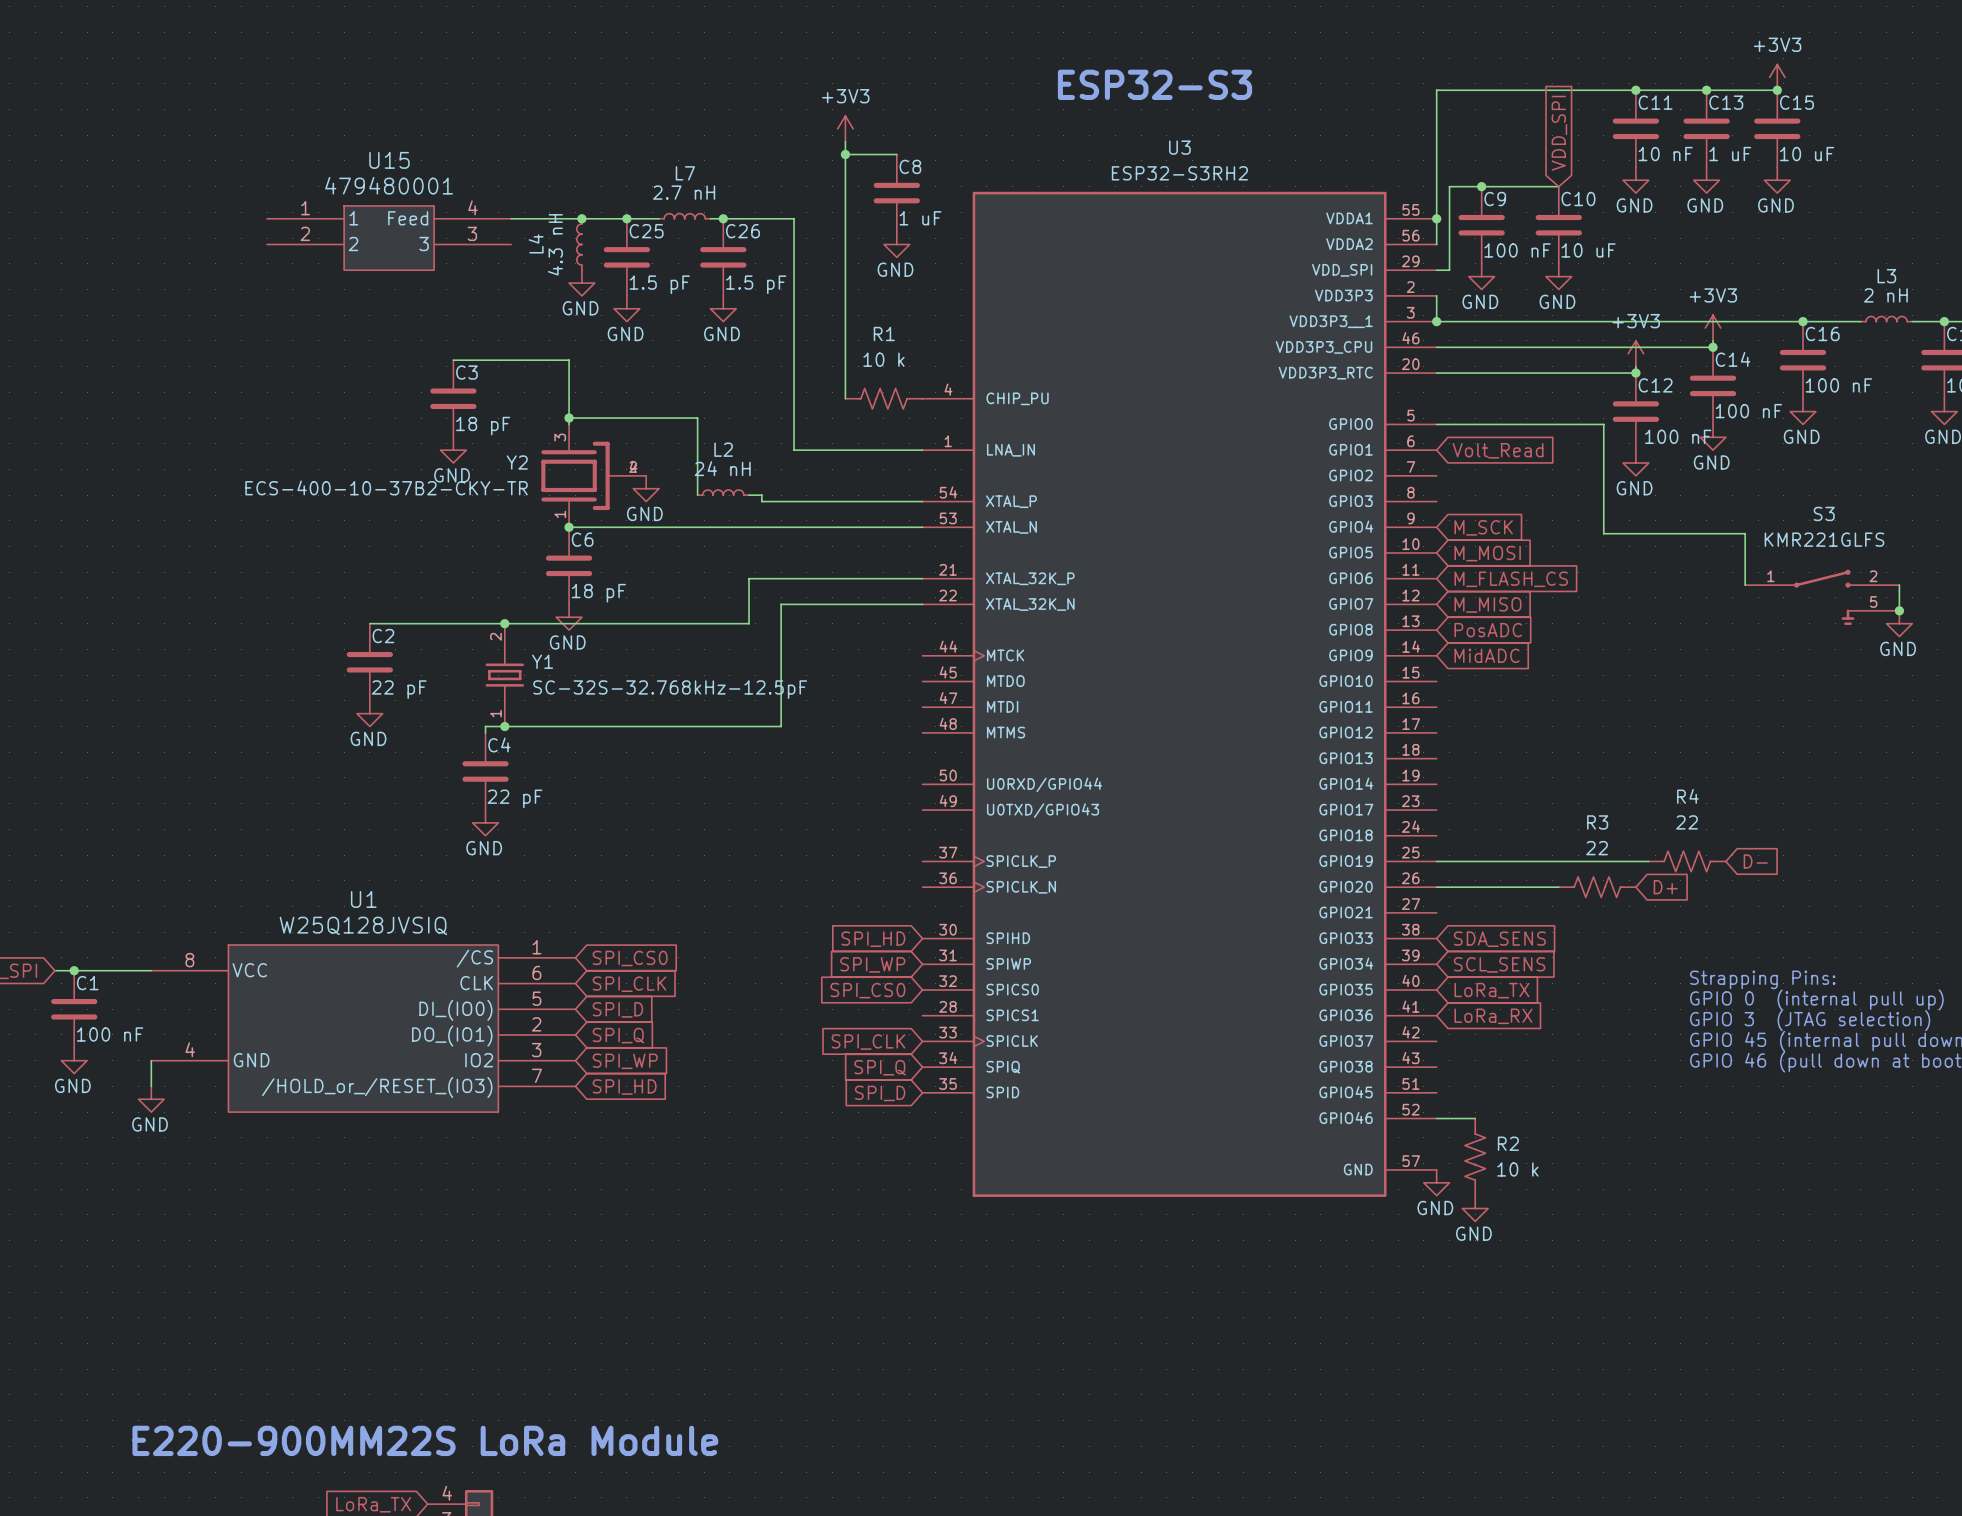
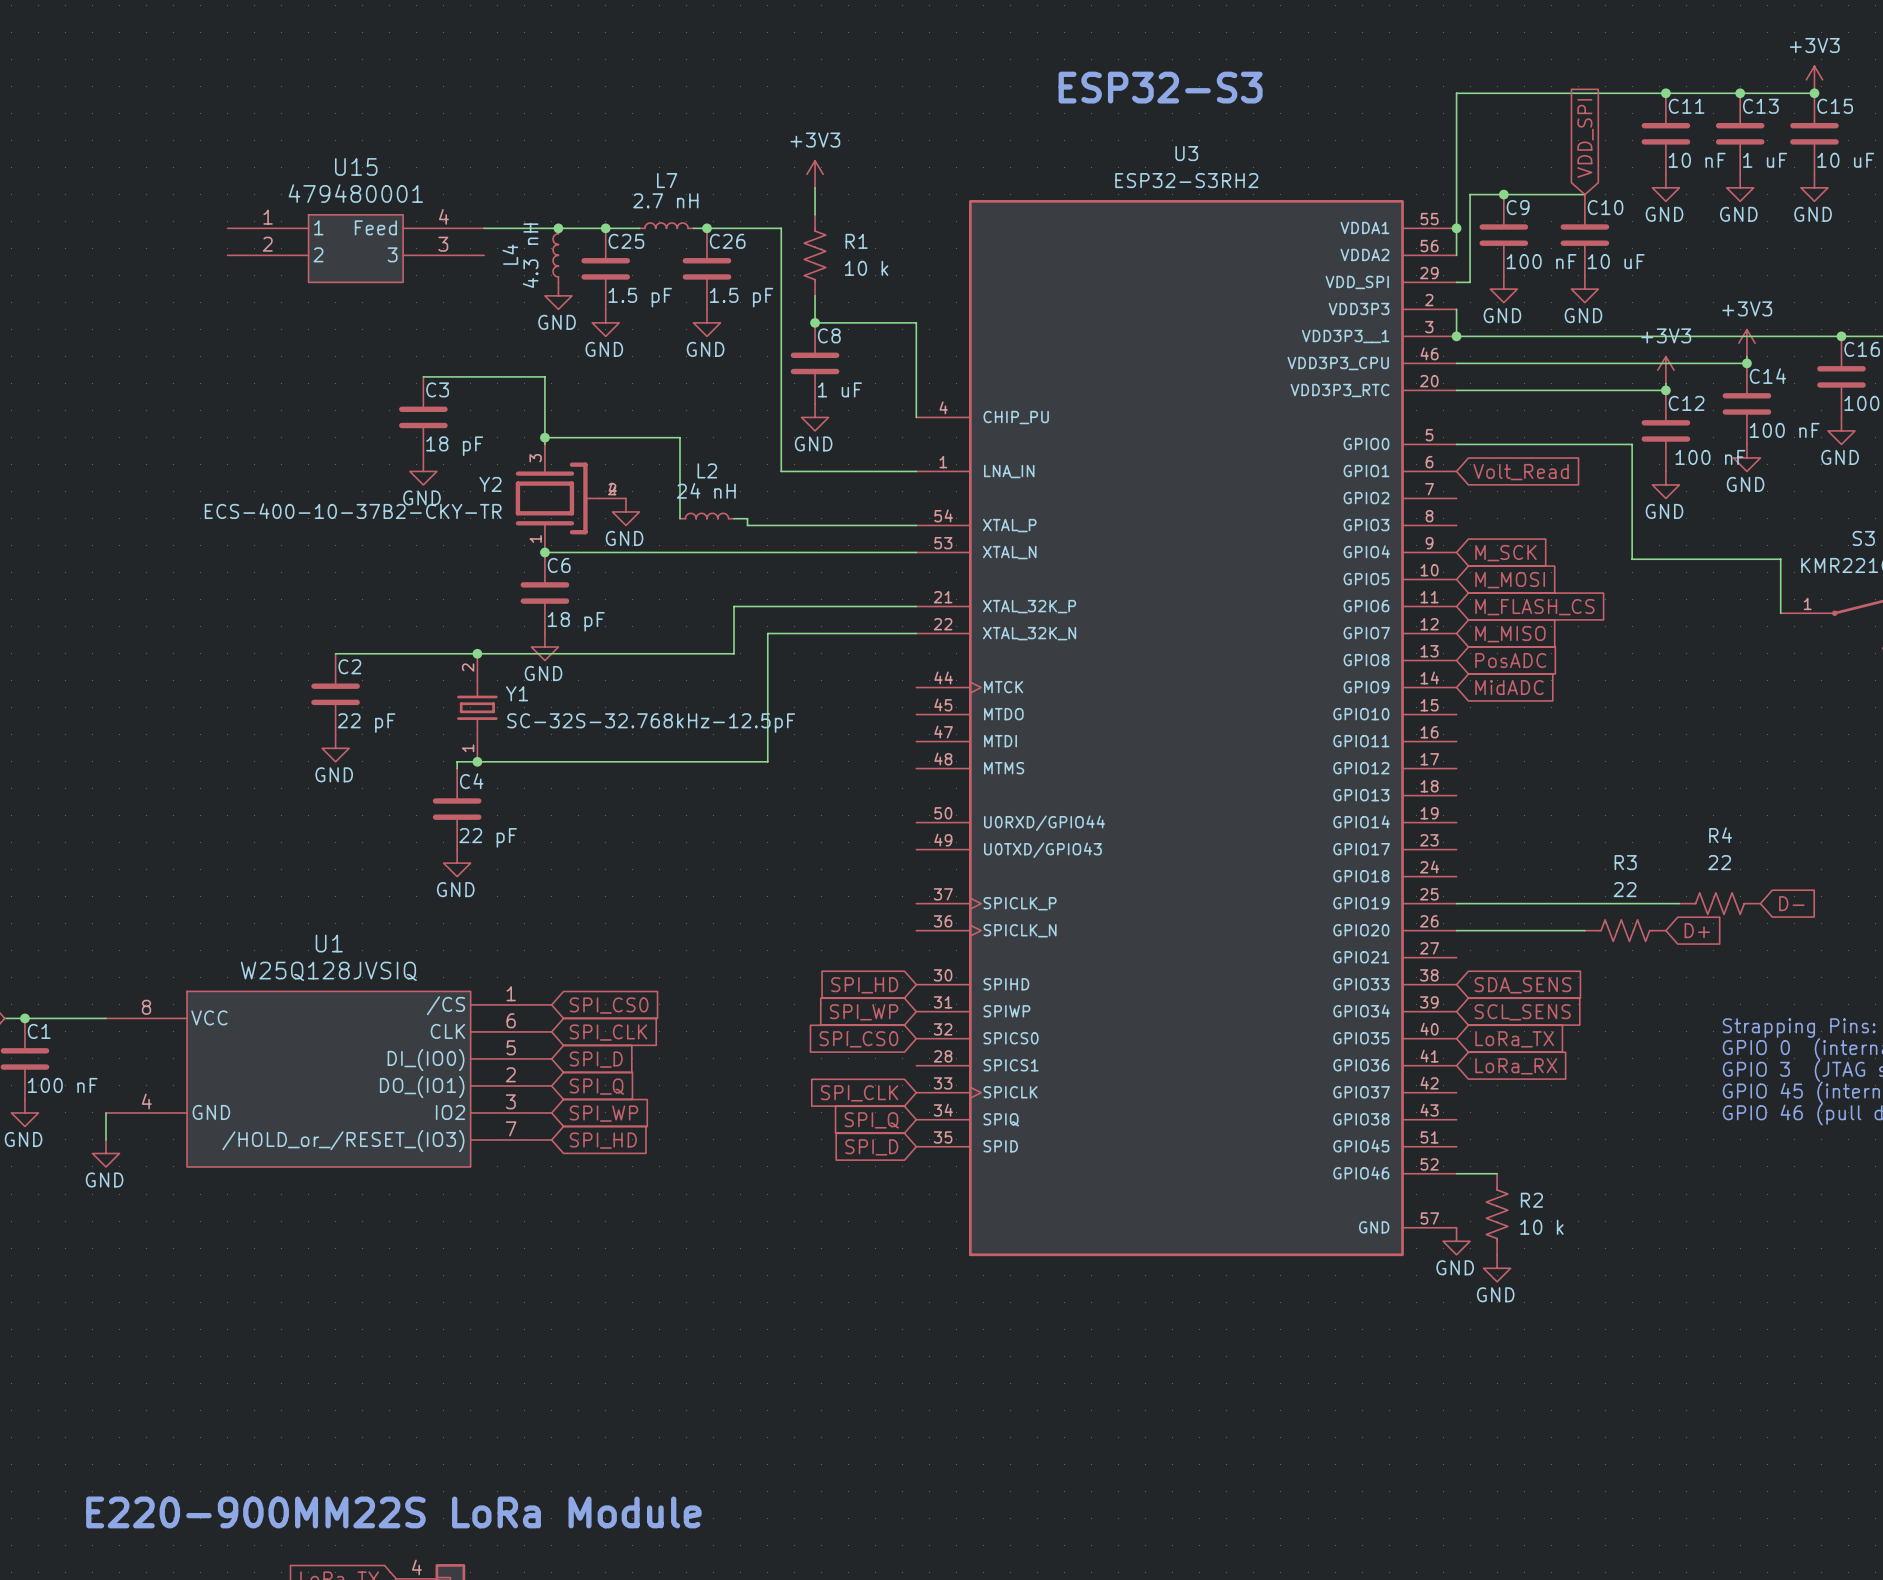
power symbol position: +3V3 (845, 128) -> +3V3 (815, 174)
wire: (845, 141) (845, 398) -> none
wire: (845, 154) (896, 154) -> none
junction: (845, 154) -> none
wire: none -> (815, 187) (815, 214)
C8 position: (896, 193) -> (815, 363)
power symbol position: GND (896, 244) -> GND (815, 417)
wire: none -> (815, 295) (815, 322) (916, 322) (916, 417)
junction: none -> (815, 322)
R1 name position: R1 (884, 333) -> R1 (856, 241)
R1 rotation: 0° (883, 398) -> 90° clockwise (815, 255)
R1 position: (883, 398) -> (815, 255)

